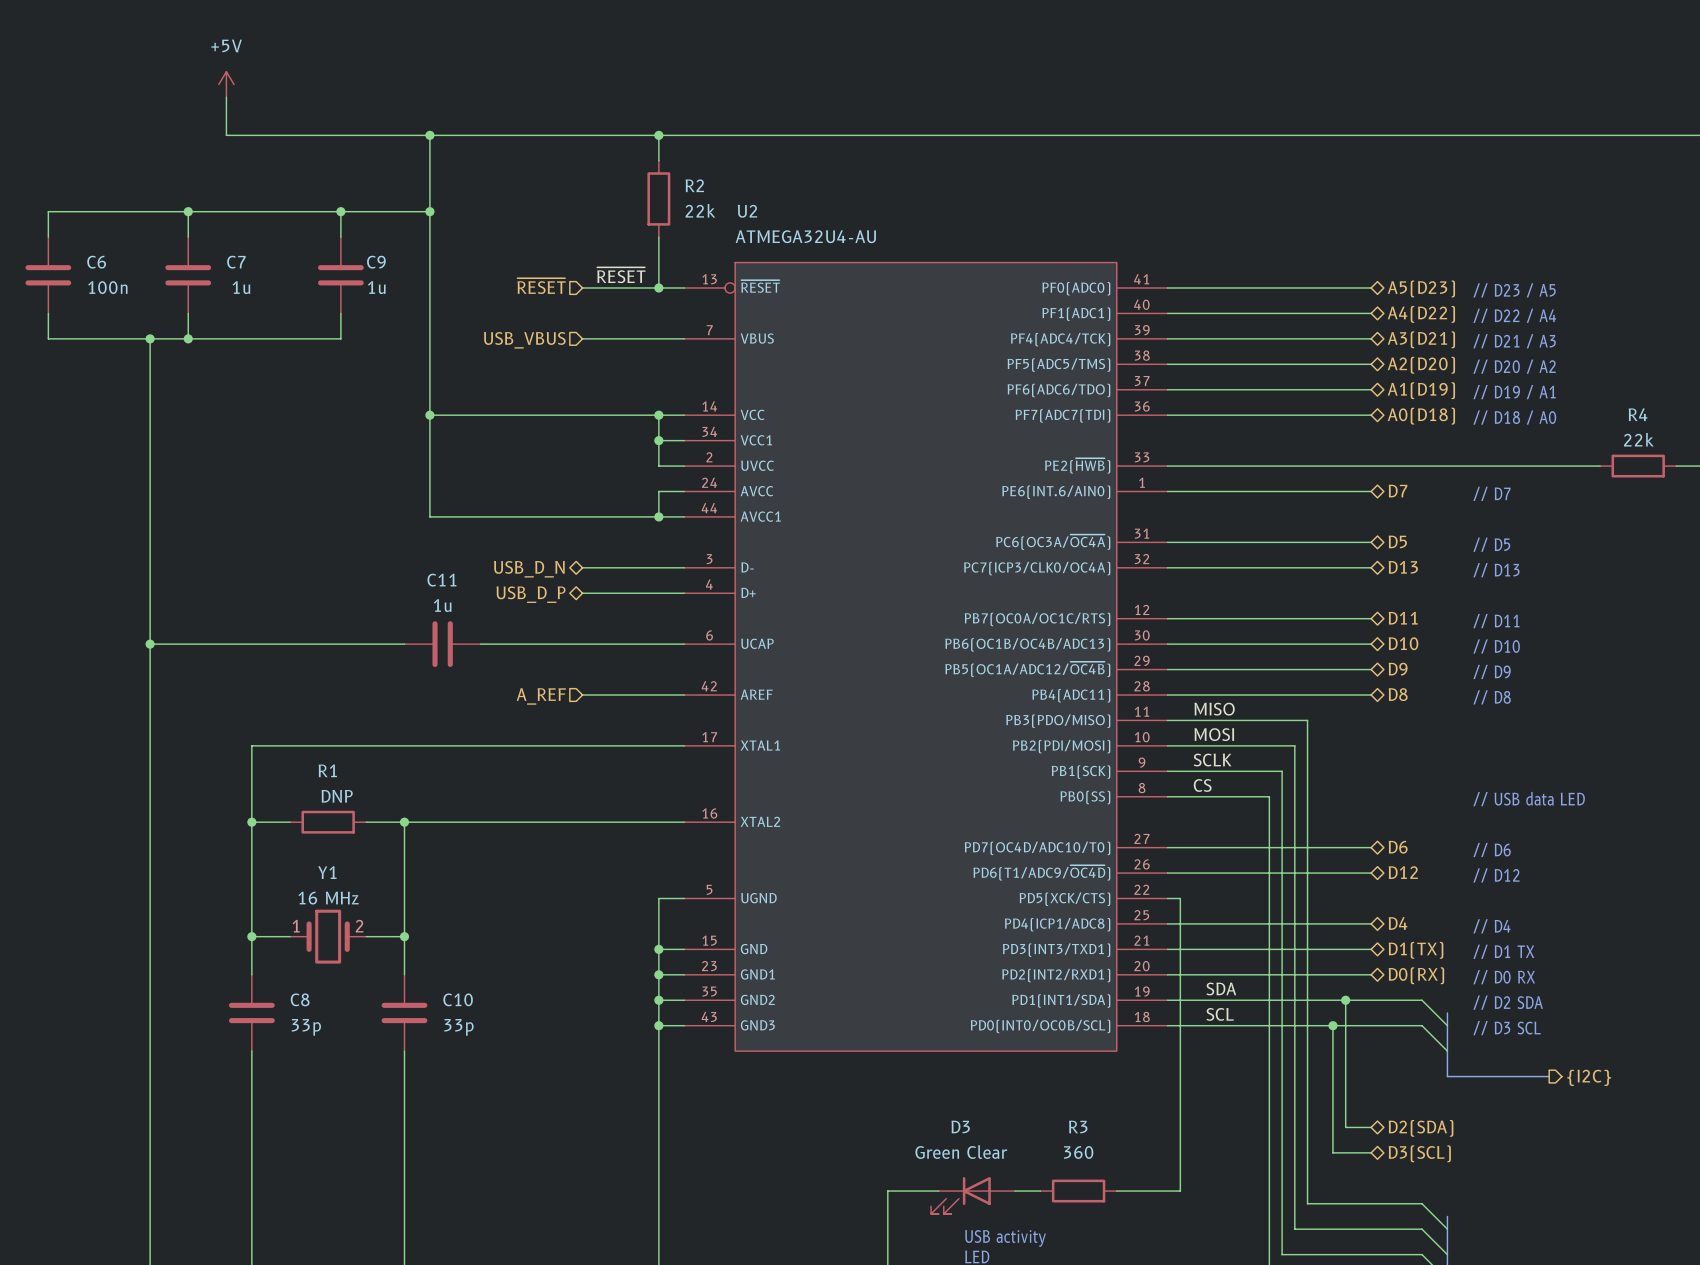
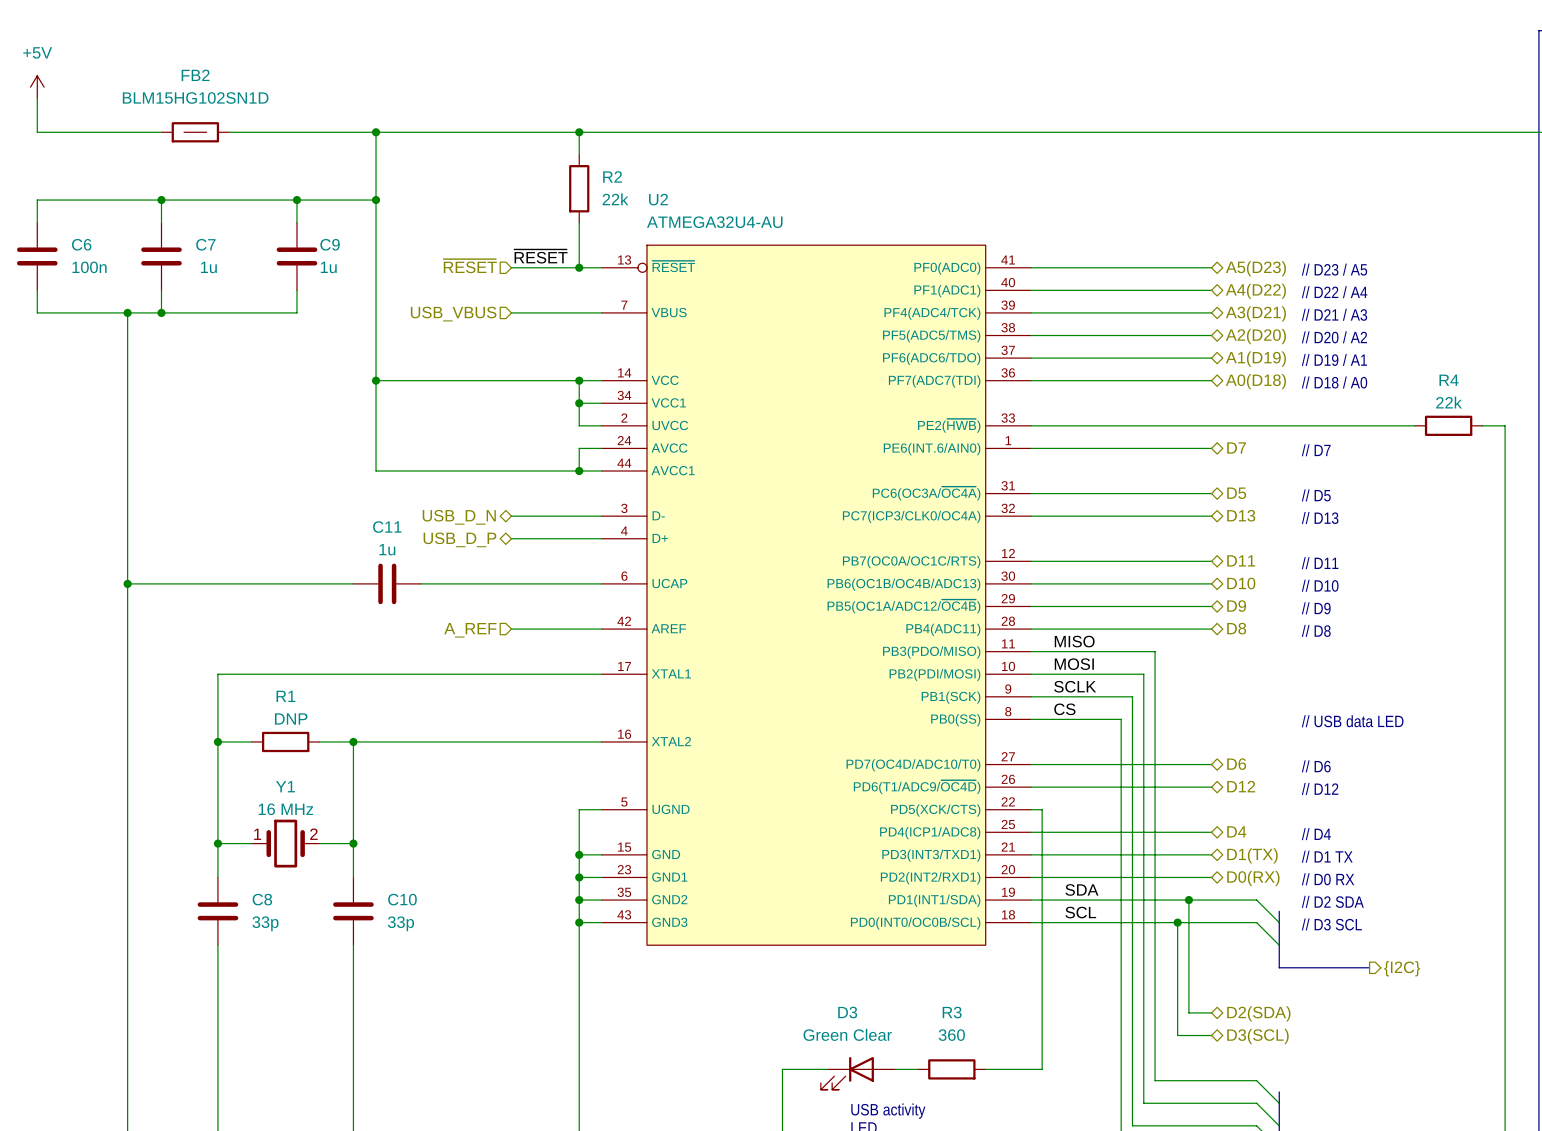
power symbol position: +5V (226, 84) -> +5V (37, 87)
wire: none -> (37, 98) (37, 132) (161, 132)
wire: (226, 97) (226, 135) (264, 135) -> none
FB2: none -> (195, 132)

